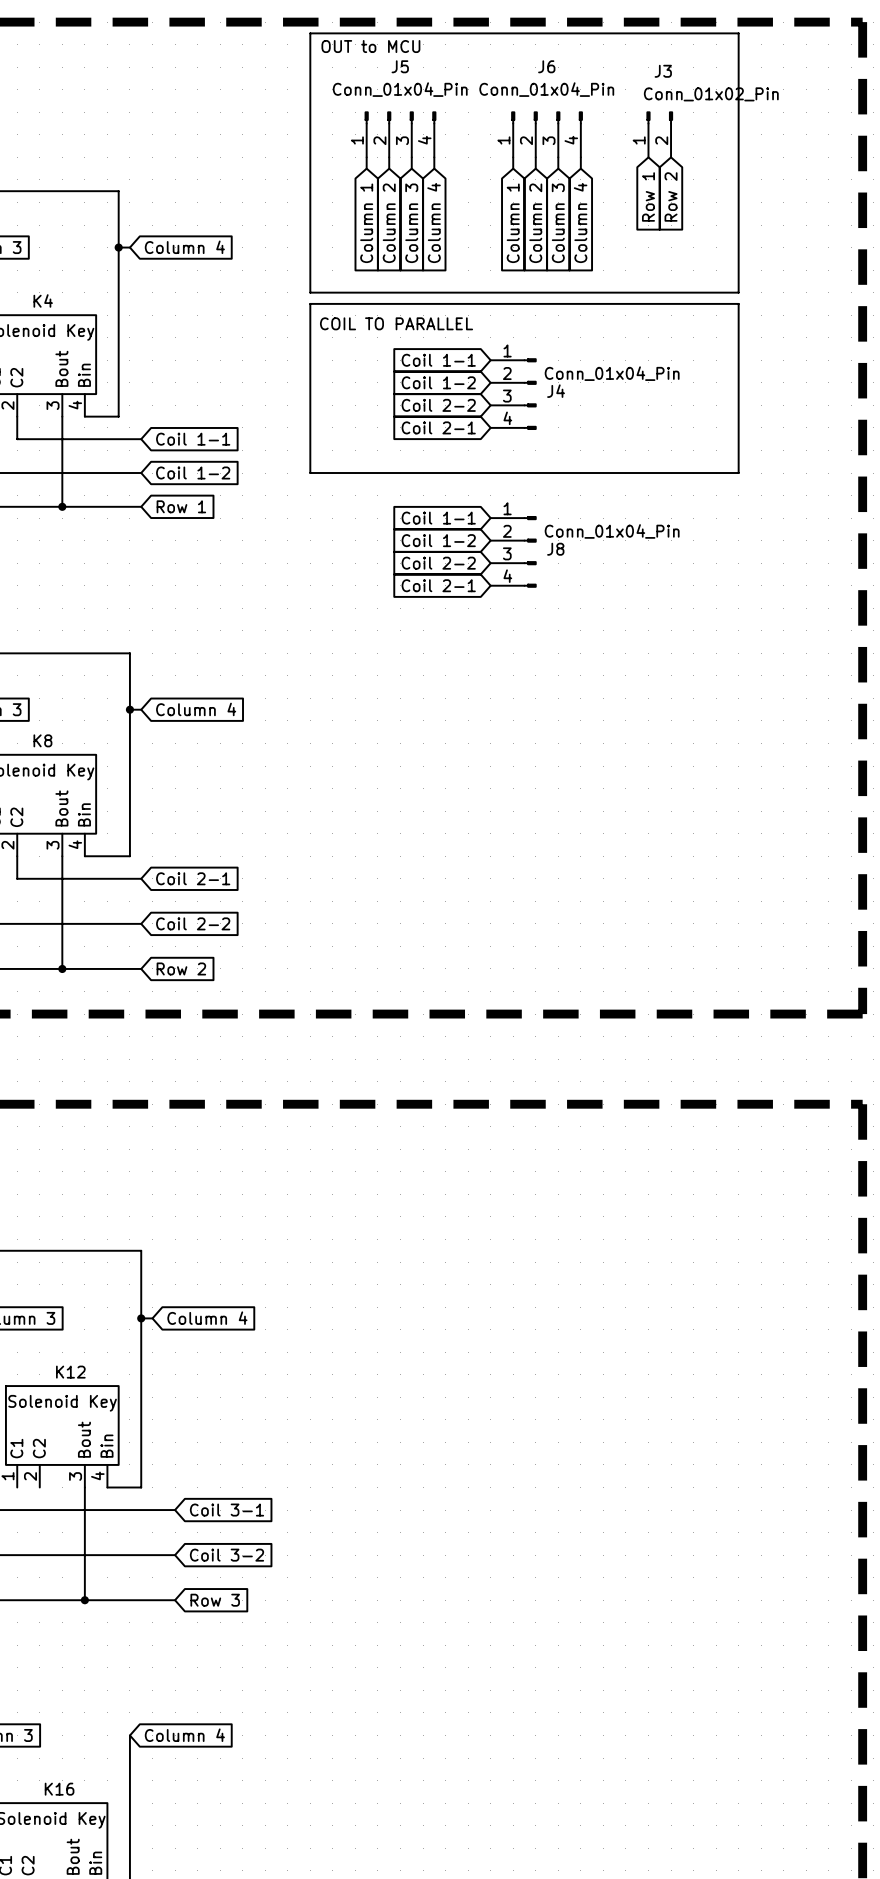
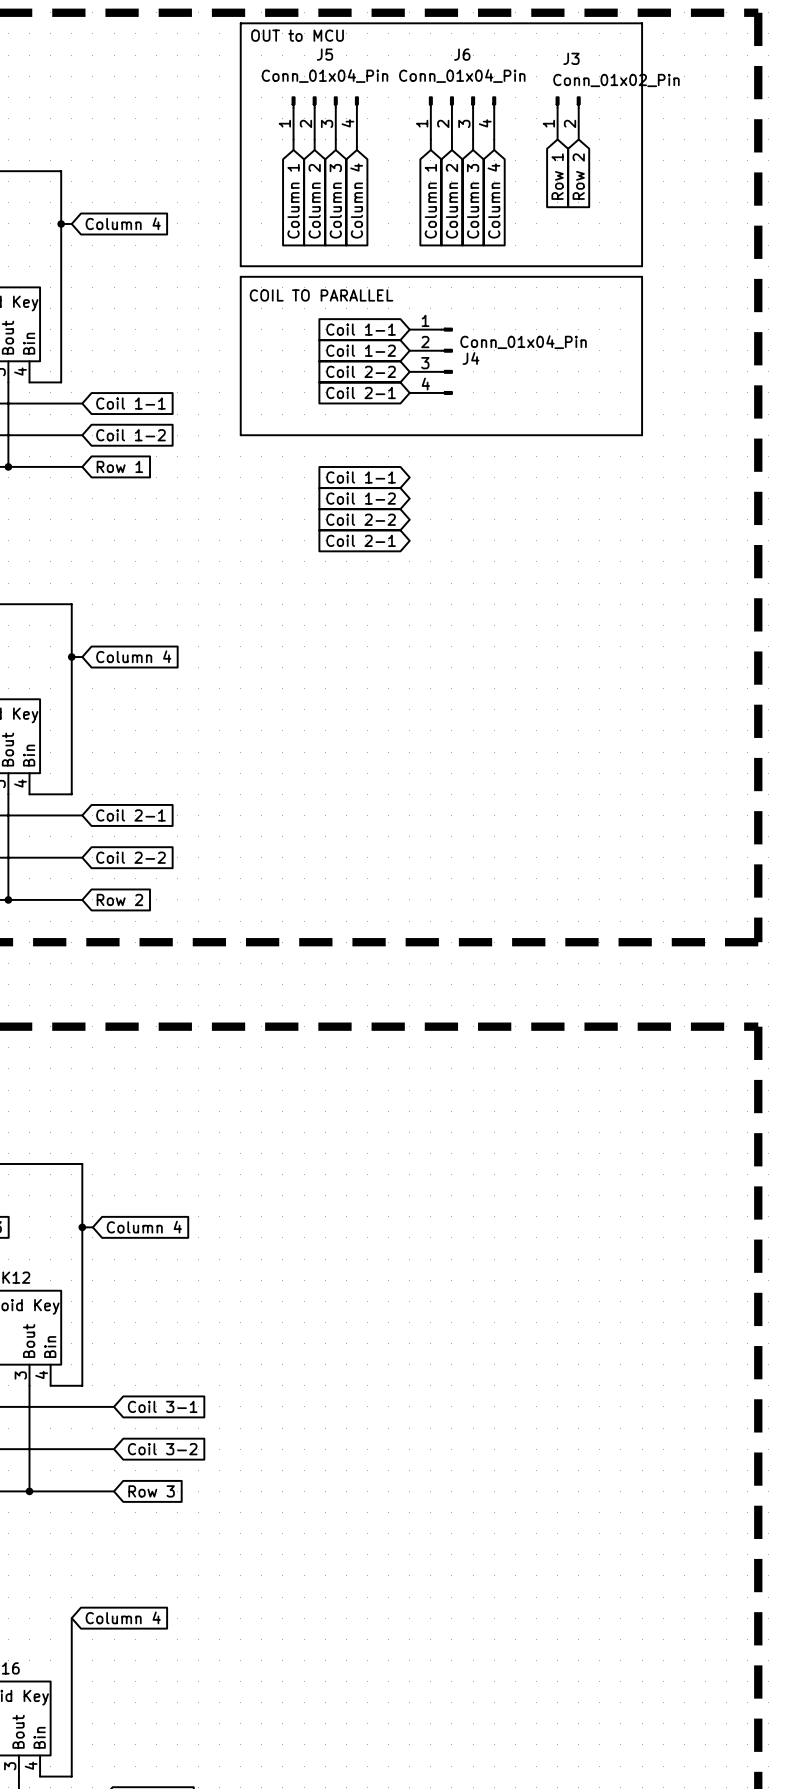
J8: Conn_01x04_Pin (513, 551) -> none

